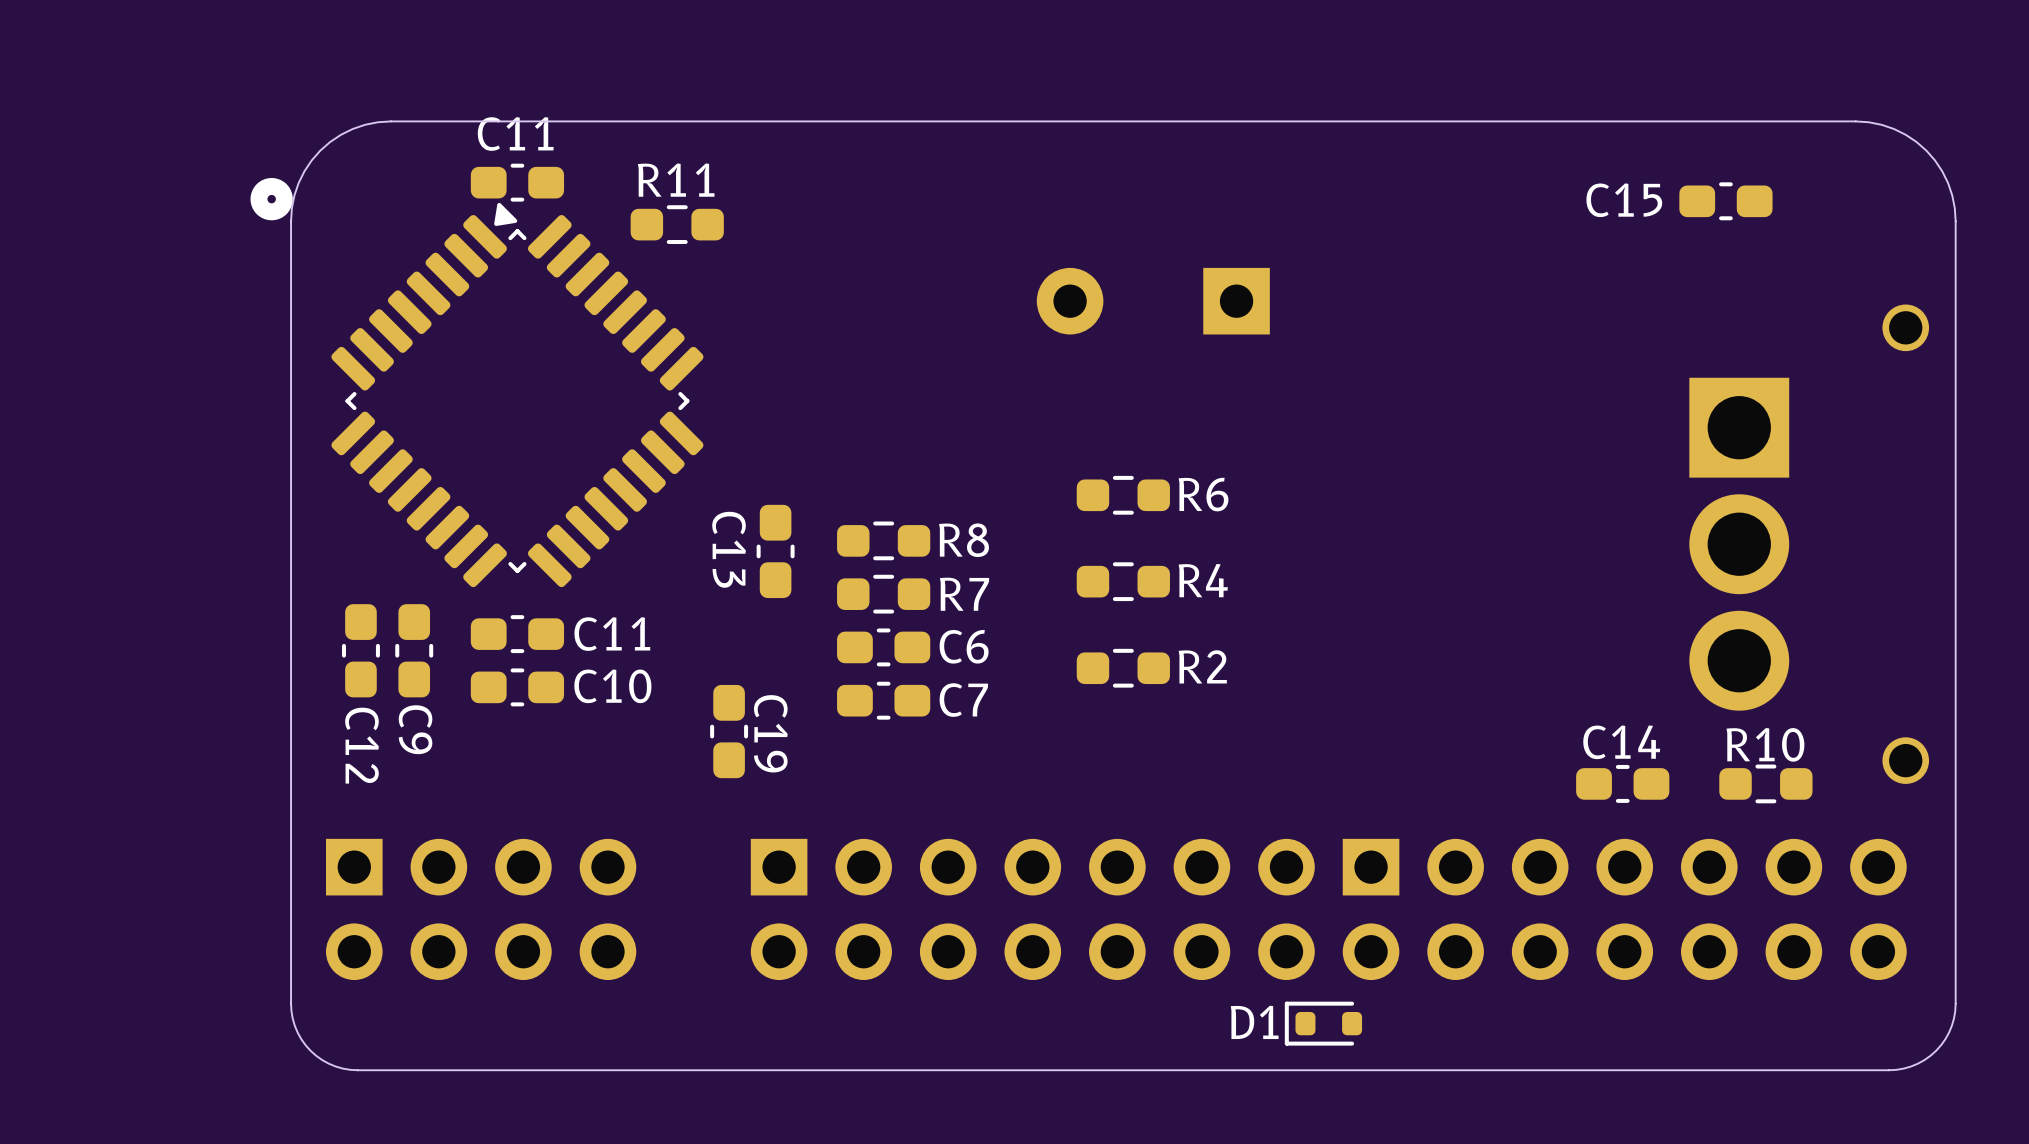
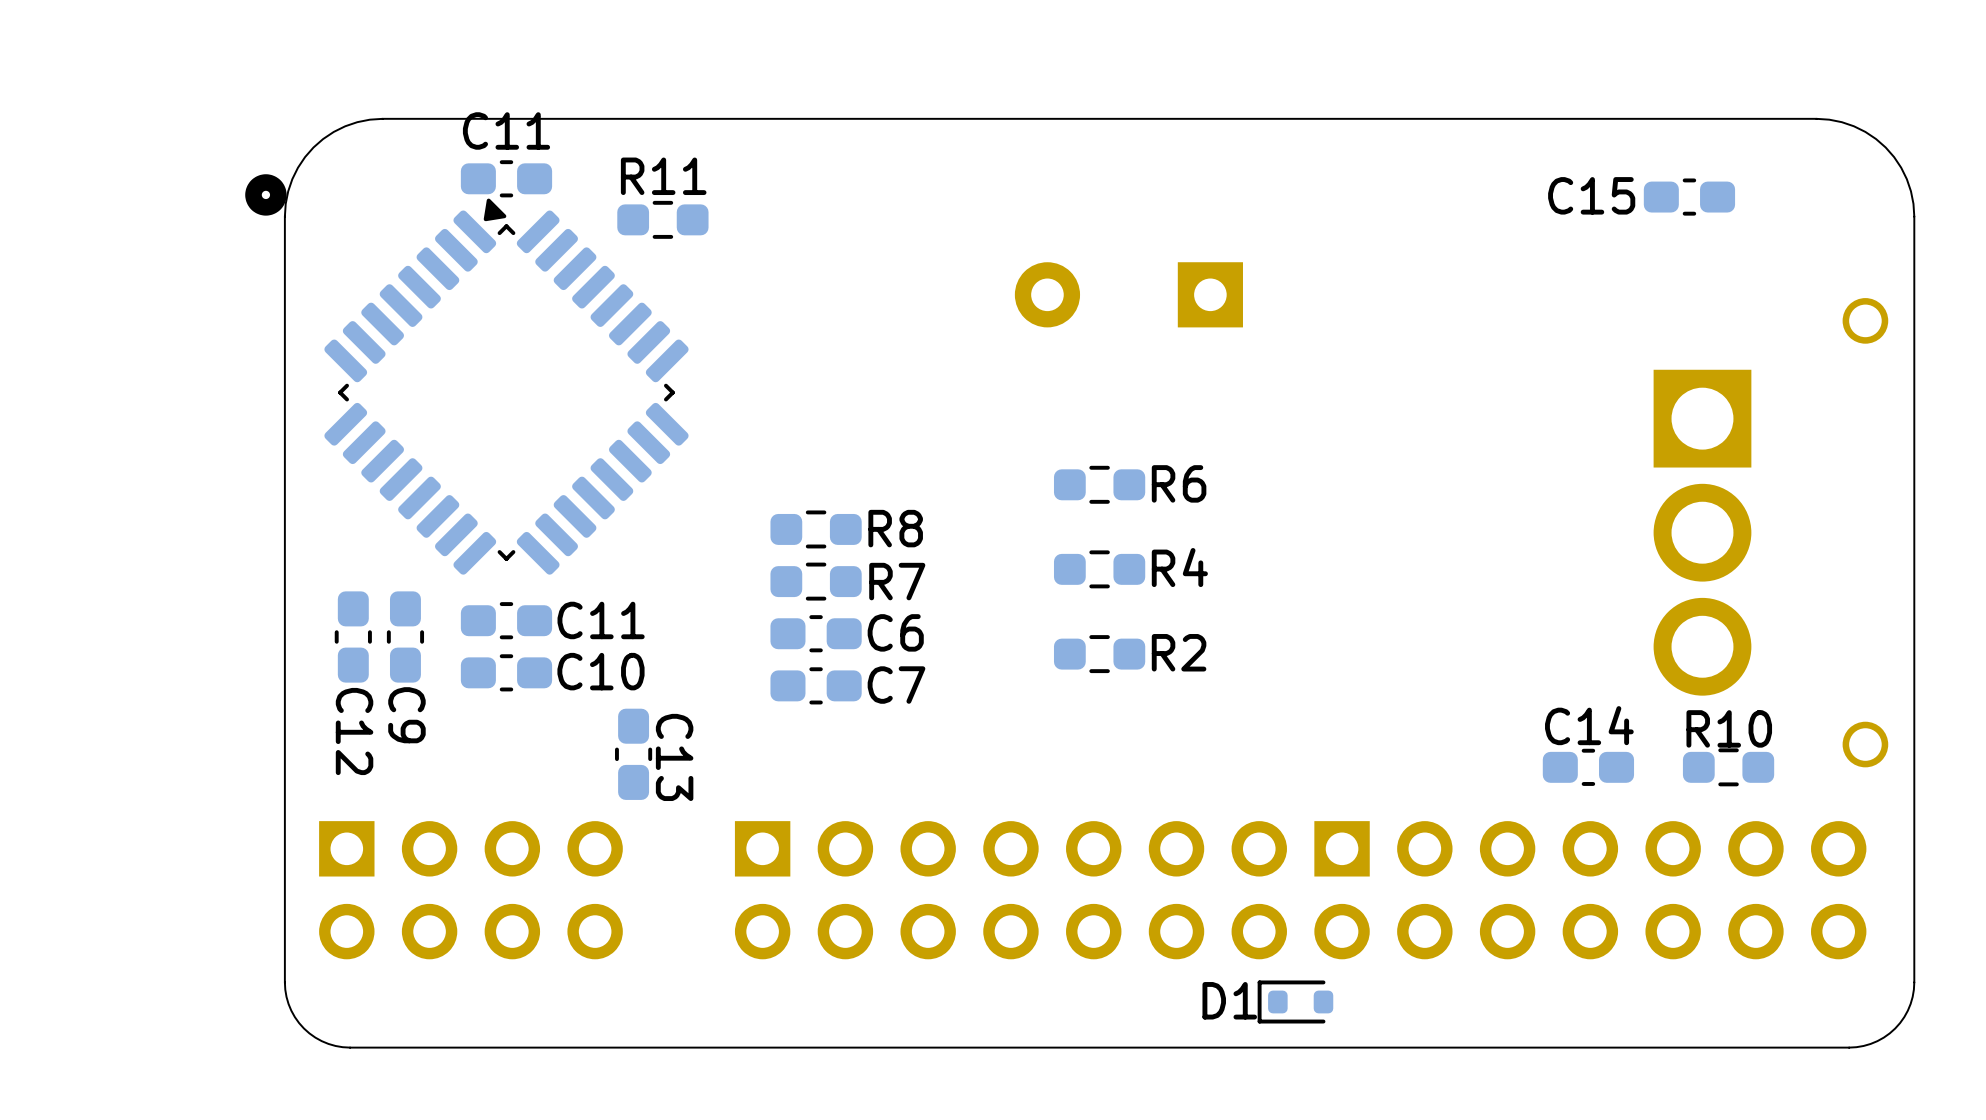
R8 position: (883, 540) -> (816, 529)
C13 name position: C13 (729, 549) -> C13 (674, 757)
C13 position: (775, 551) -> (633, 754)
R7 position: (883, 594) -> (816, 581)
C6 position: (883, 647) -> (816, 633)
C7 position: (883, 700) -> (816, 685)
C19: (729, 731) -> none

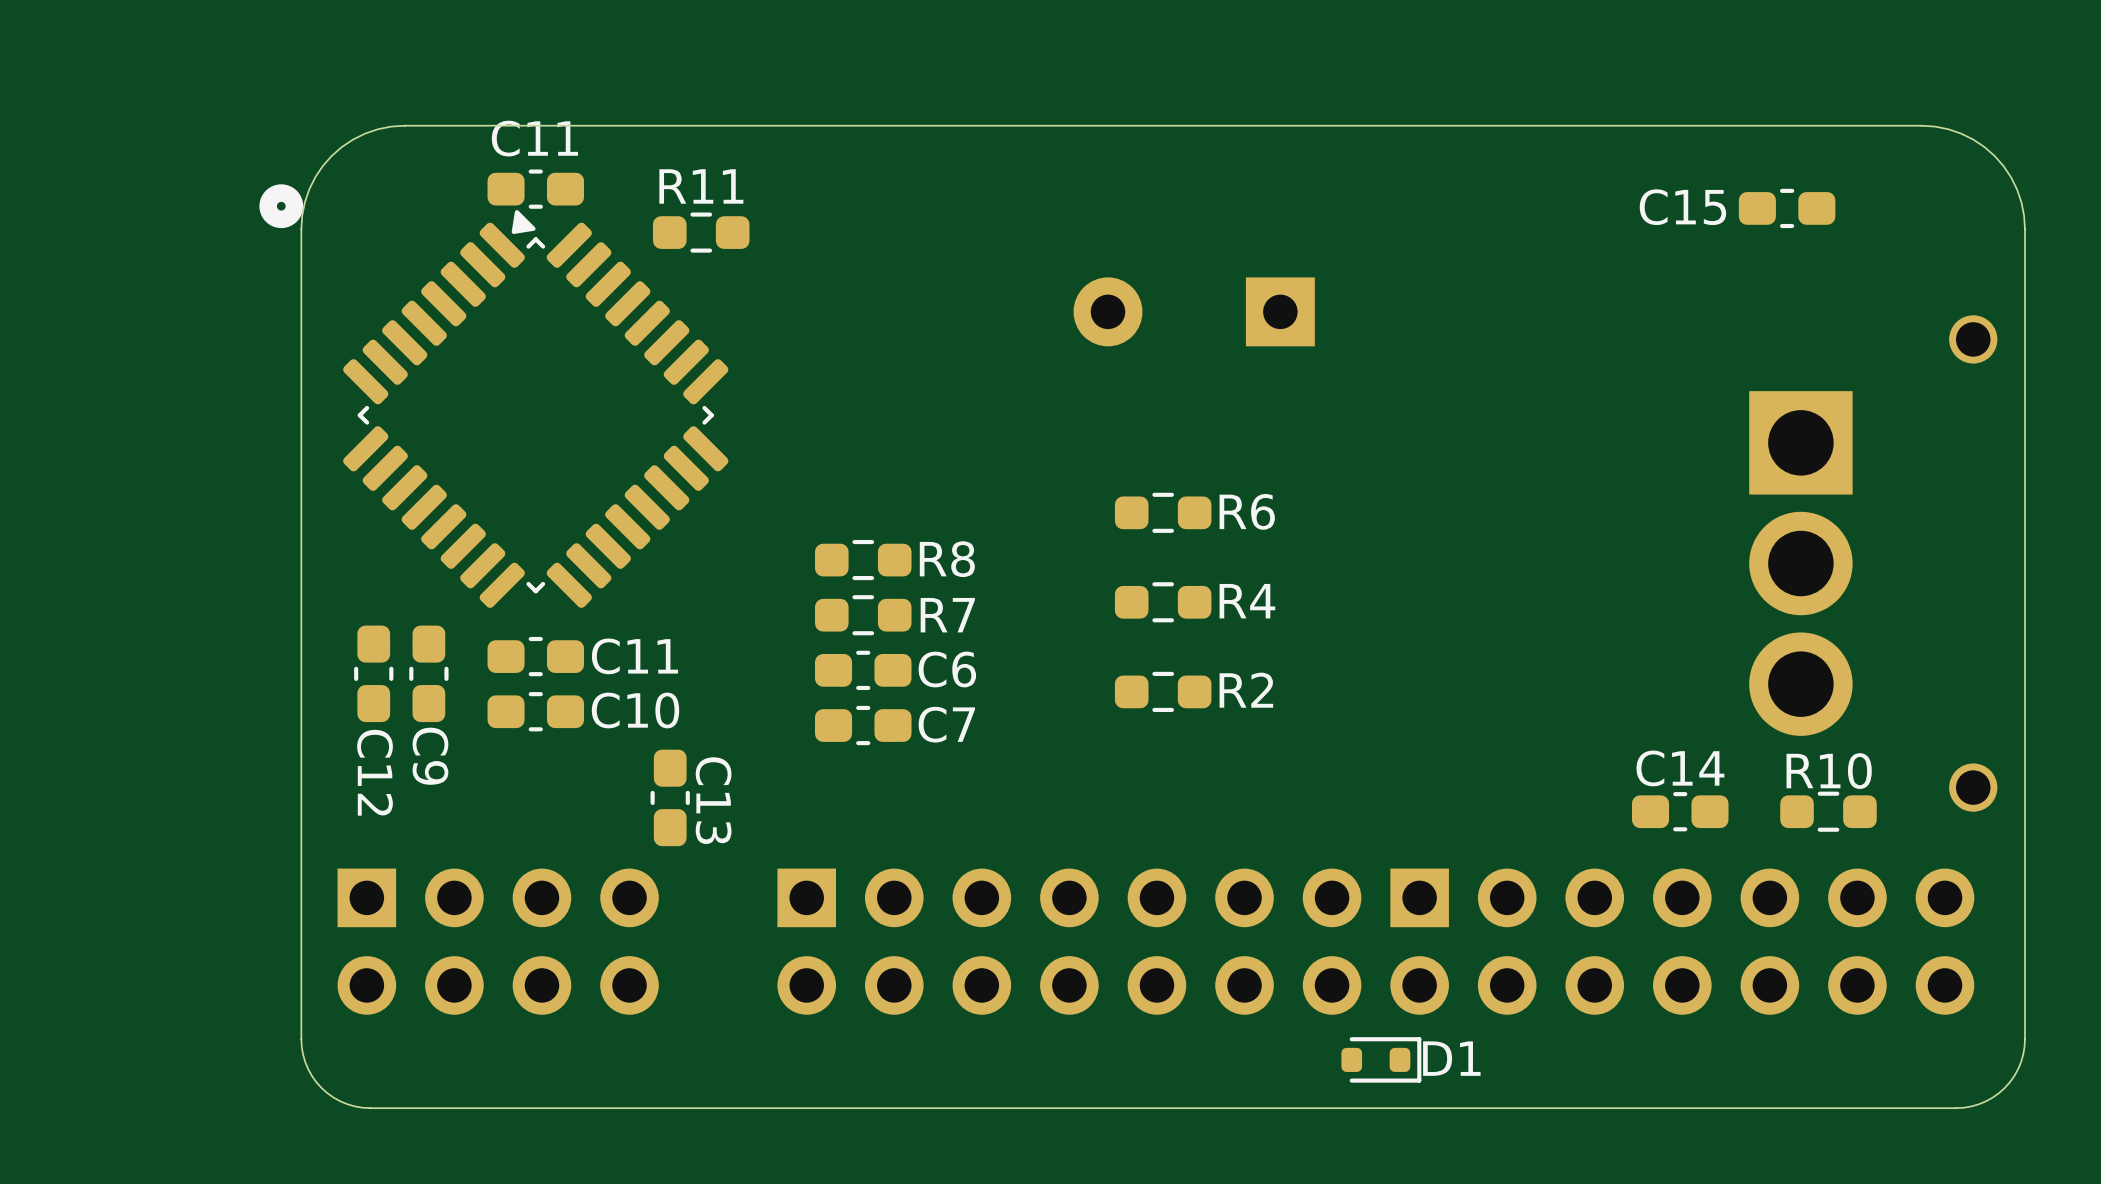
D1 rotation: 0° (1295, 1001) -> 180° (1381, 1059)

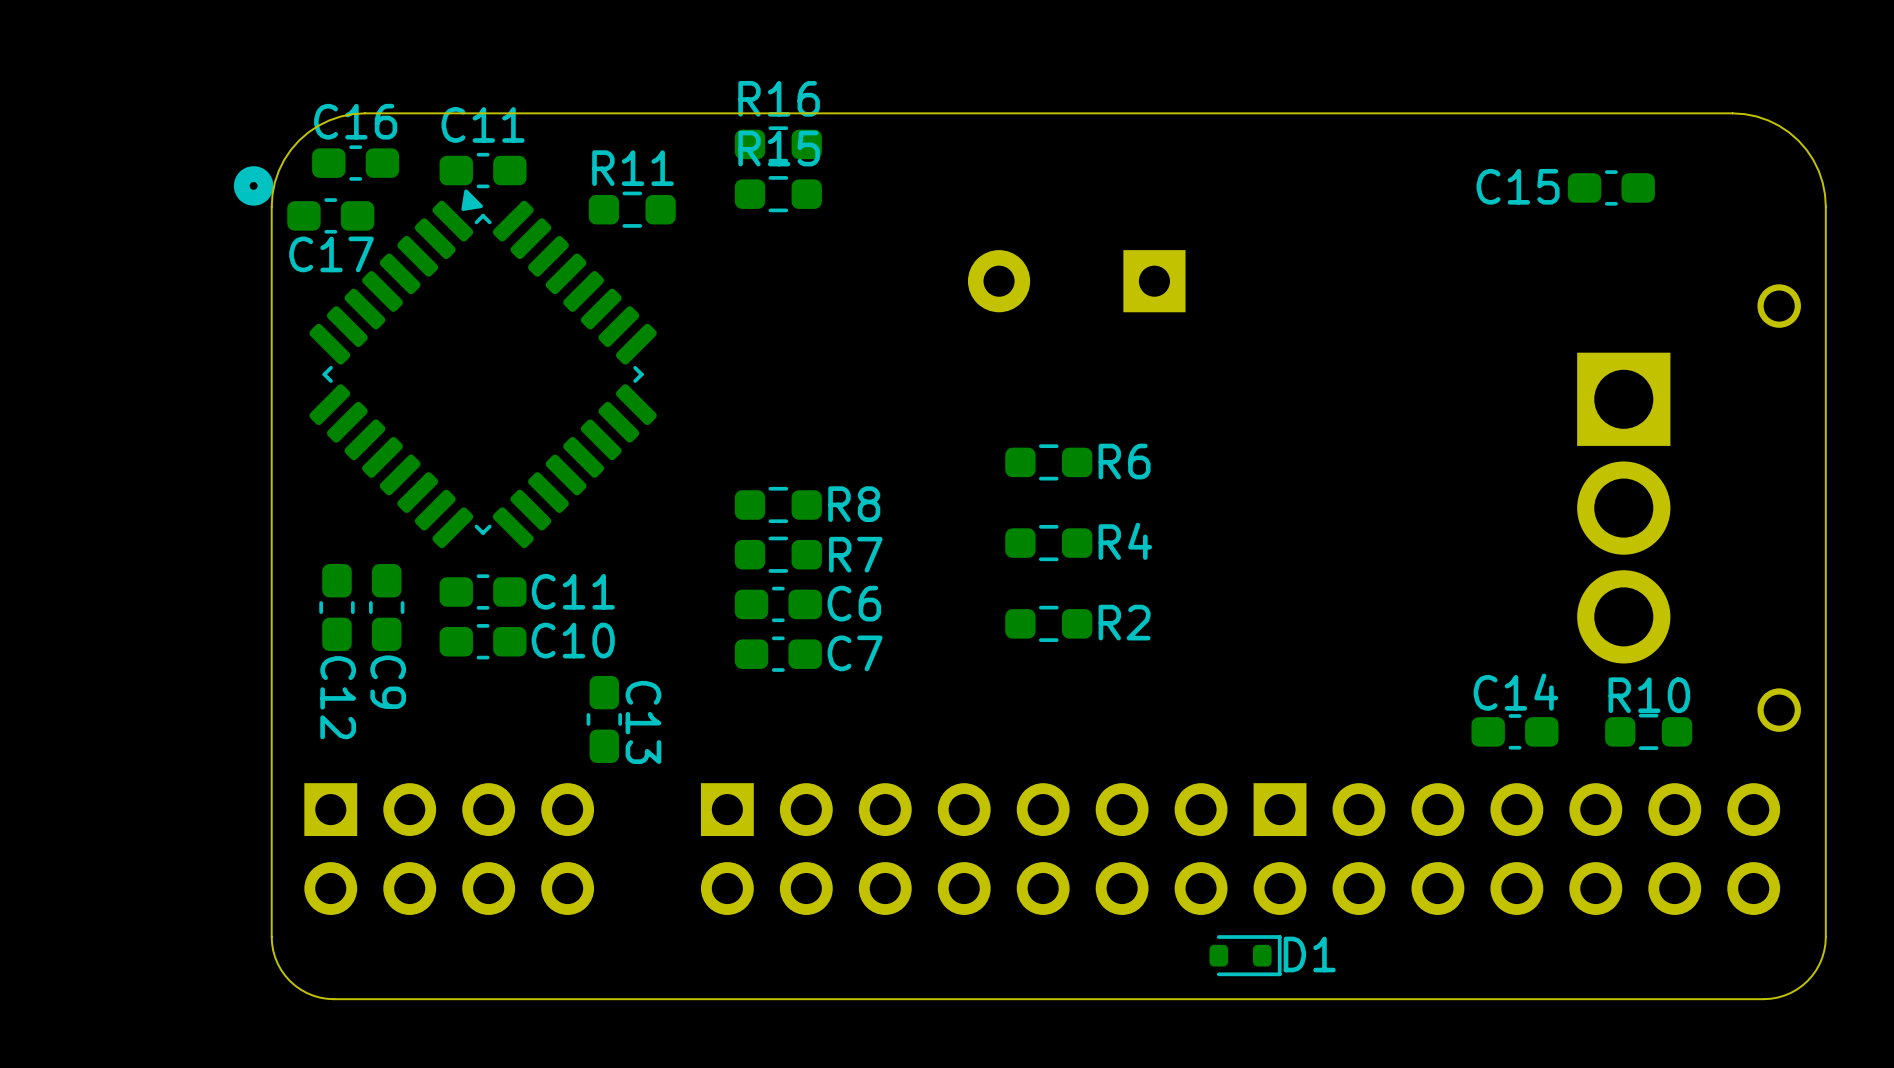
R16: none -> (778, 144)
C16: none -> (355, 163)
R15: none -> (778, 194)
C17: none -> (330, 215)

